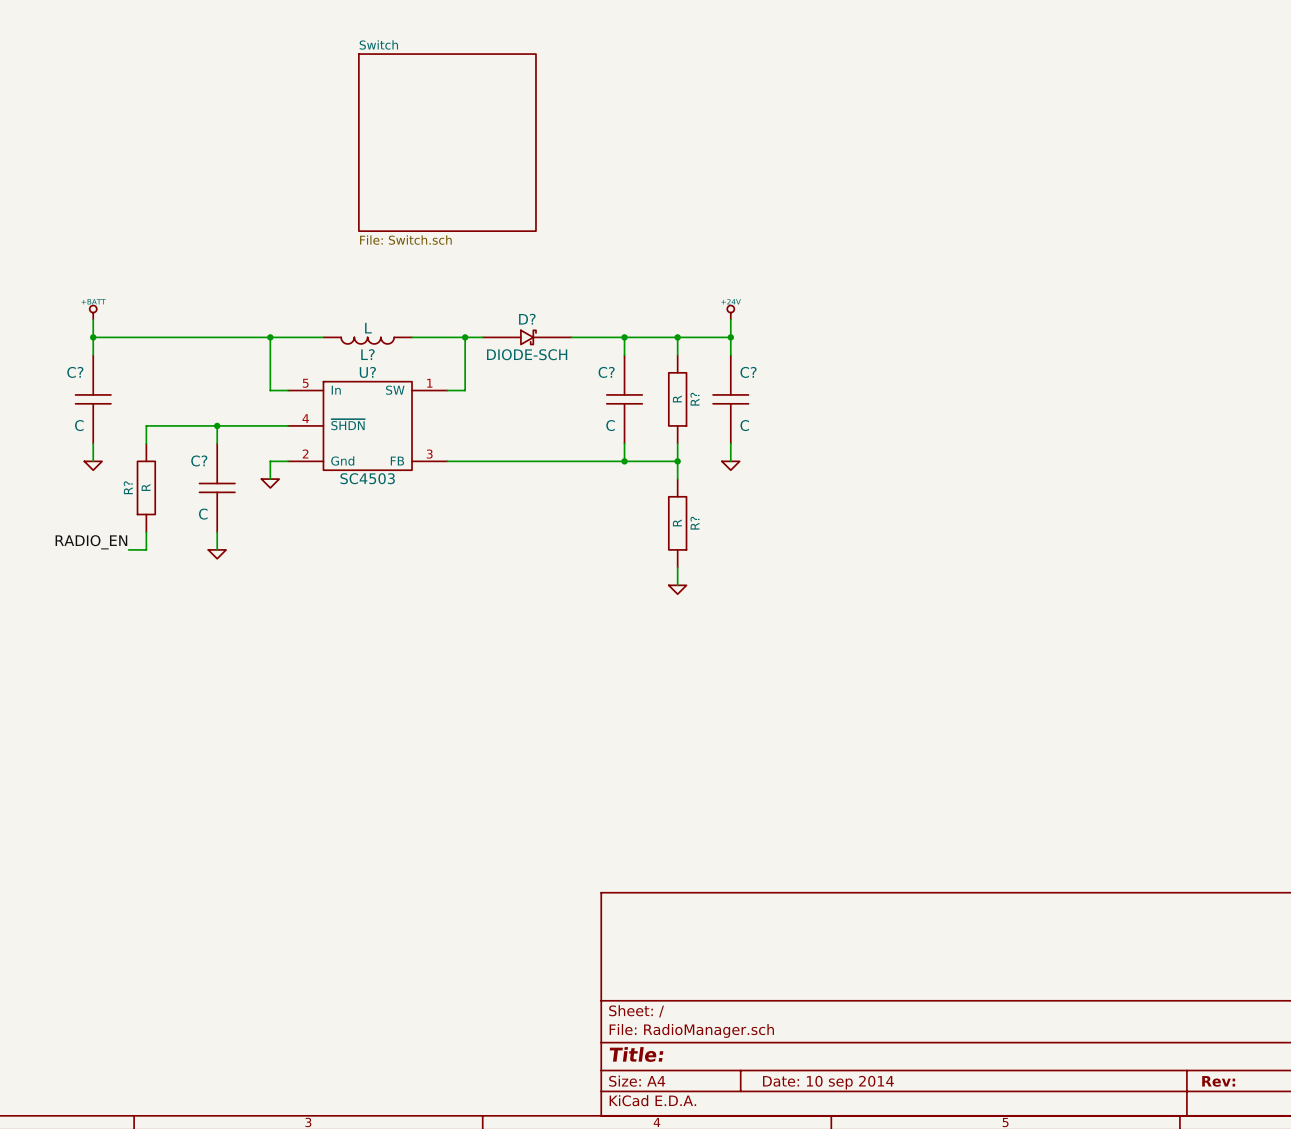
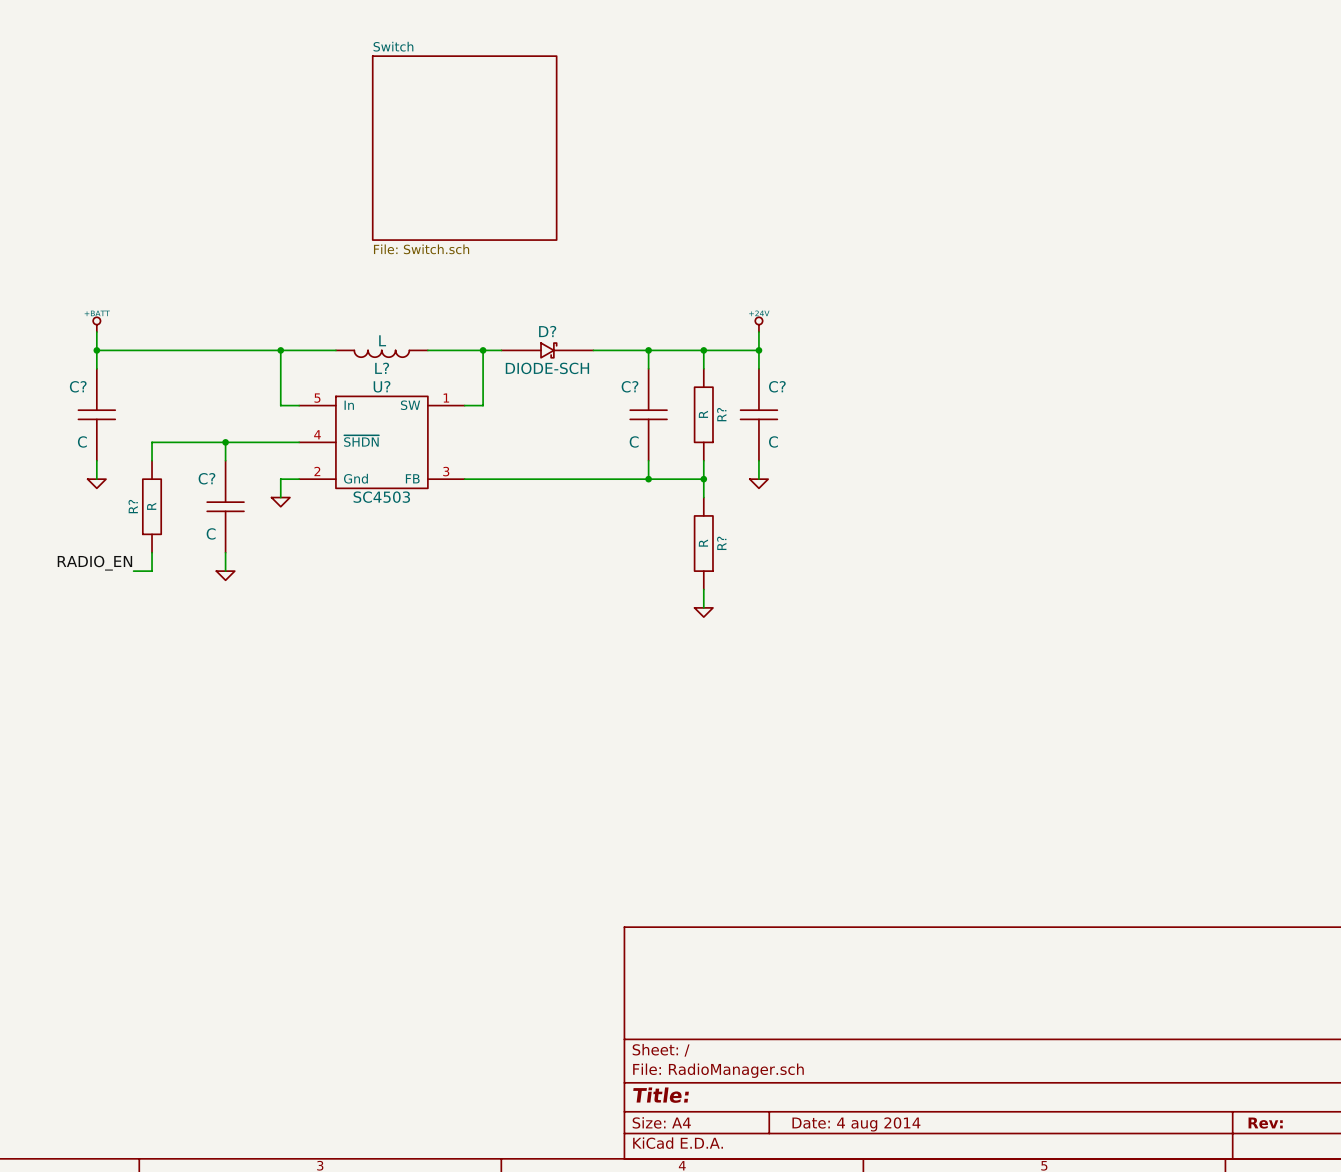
title block: Date: 10 sep 2014 (828, 1082) -> Date: 4 aug 2014 (856, 1124)

